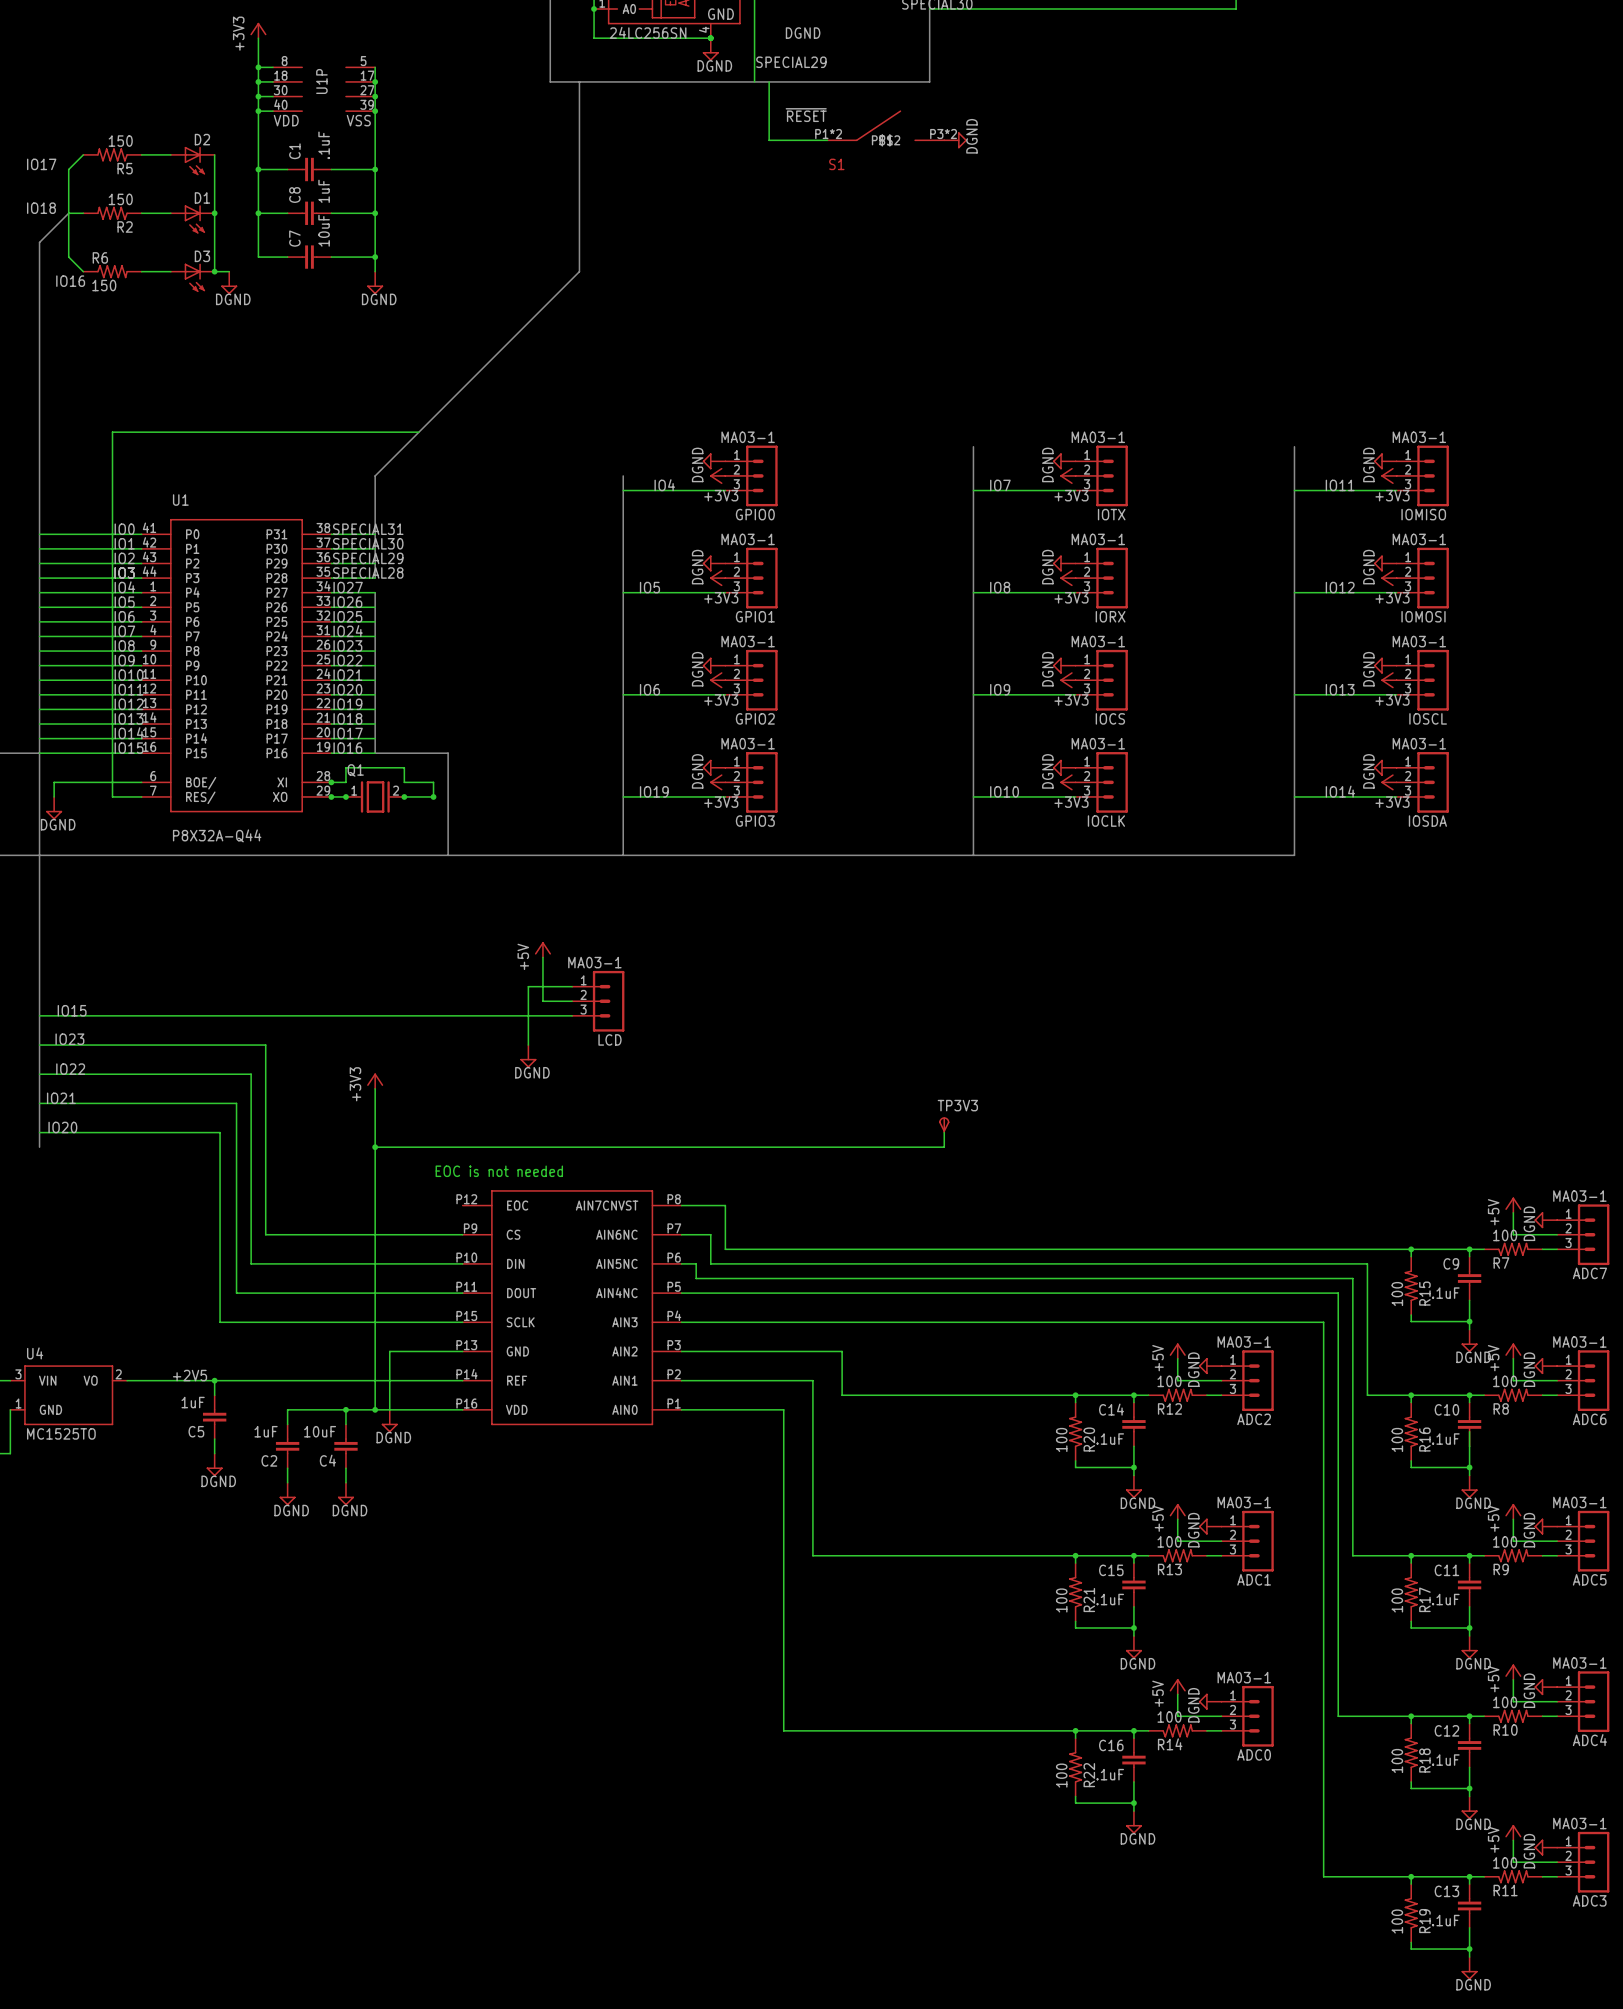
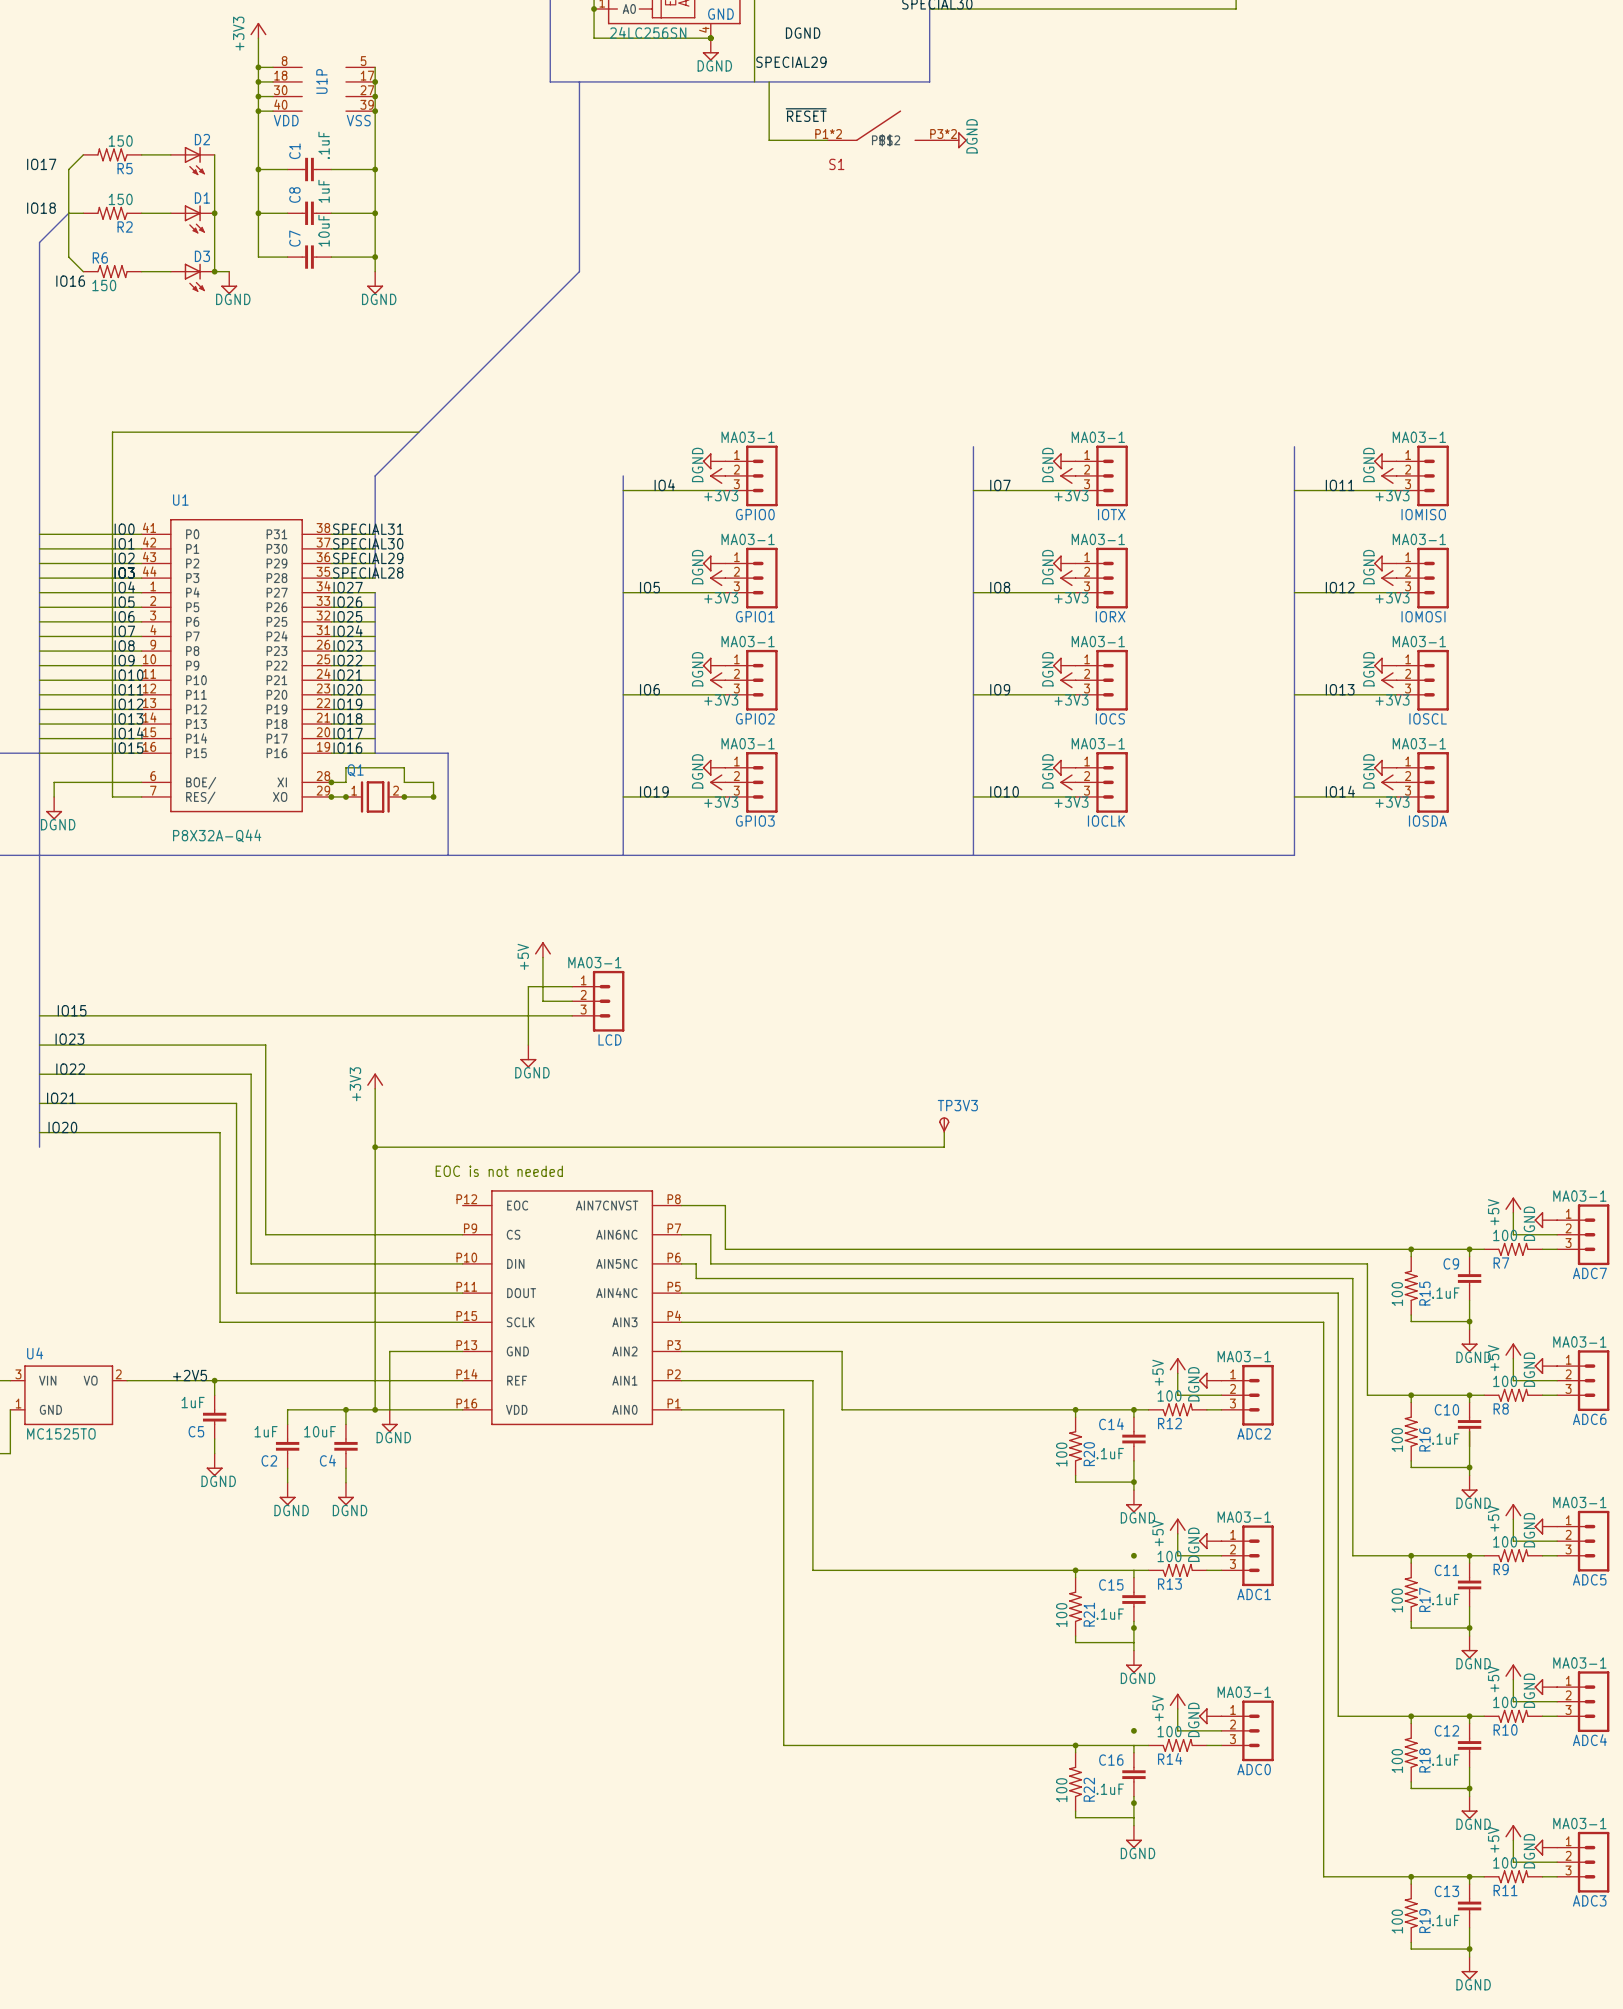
power symbol position: +5V (1177, 1351) -> +5V (1177, 1365)
power symbol position: DGND (1210, 1366) -> DGND (1210, 1380)
ADC2 position: (1247, 1380) -> (1247, 1395)
wire: (842, 1395) (1148, 1395) -> (842, 1395) (842, 1409) (1148, 1409)
junction position: (1075, 1395) -> (1075, 1409)
junction position: (1133, 1395) -> (1133, 1409)
R12 position: (1177, 1395) -> (1177, 1409)
wire: none -> (1206, 1409) (1221, 1409)
C14 position: (1133, 1424) -> (1133, 1439)
R20 position: (1075, 1431) -> (1075, 1446)
wire: (1075, 1460) (1075, 1467) (1133, 1467) -> (1075, 1475) (1075, 1482) (1133, 1482)
junction position: (1133, 1467) -> (1133, 1482)
power symbol position: DGND (1133, 1486) -> DGND (1133, 1501)
power symbol position: +5V (1177, 1511) -> +5V (1177, 1526)
power symbol position: DGND (1210, 1526) -> DGND (1210, 1541)
ADC1 position: (1247, 1541) -> (1247, 1555)
wire: (812, 1555) (1148, 1555) -> (812, 1555) (812, 1570) (1148, 1570)
junction position: (1075, 1555) -> (1075, 1570)
R13 position: (1177, 1555) -> (1177, 1570)
wire: none -> (1206, 1570) (1221, 1570)
C15 position: (1133, 1584) -> (1133, 1599)
R21 position: (1075, 1592) -> (1075, 1606)
wire: (1075, 1621) (1075, 1628) (1133, 1628) -> (1075, 1636) (1075, 1642) (1133, 1642)
power symbol position: DGND (1133, 1647) -> DGND (1133, 1661)
power symbol position: +5V (1177, 1686) -> +5V (1177, 1701)
power symbol position: DGND (1210, 1701) -> DGND (1210, 1716)
ADC0 position: (1247, 1716) -> (1247, 1730)
wire: (783, 1730) (1148, 1730) -> (783, 1730) (783, 1745) (1148, 1745)
junction position: (1075, 1730) -> (1075, 1745)
R14 position: (1177, 1730) -> (1177, 1745)
wire: none -> (1206, 1745) (1221, 1745)
C16 position: (1133, 1760) -> (1133, 1774)
R22 position: (1075, 1767) -> (1075, 1781)
wire: (1075, 1796) (1075, 1803) (1133, 1803) -> (1075, 1811) (1075, 1817) (1133, 1817)
power symbol position: DGND (1133, 1822) -> DGND (1133, 1837)

